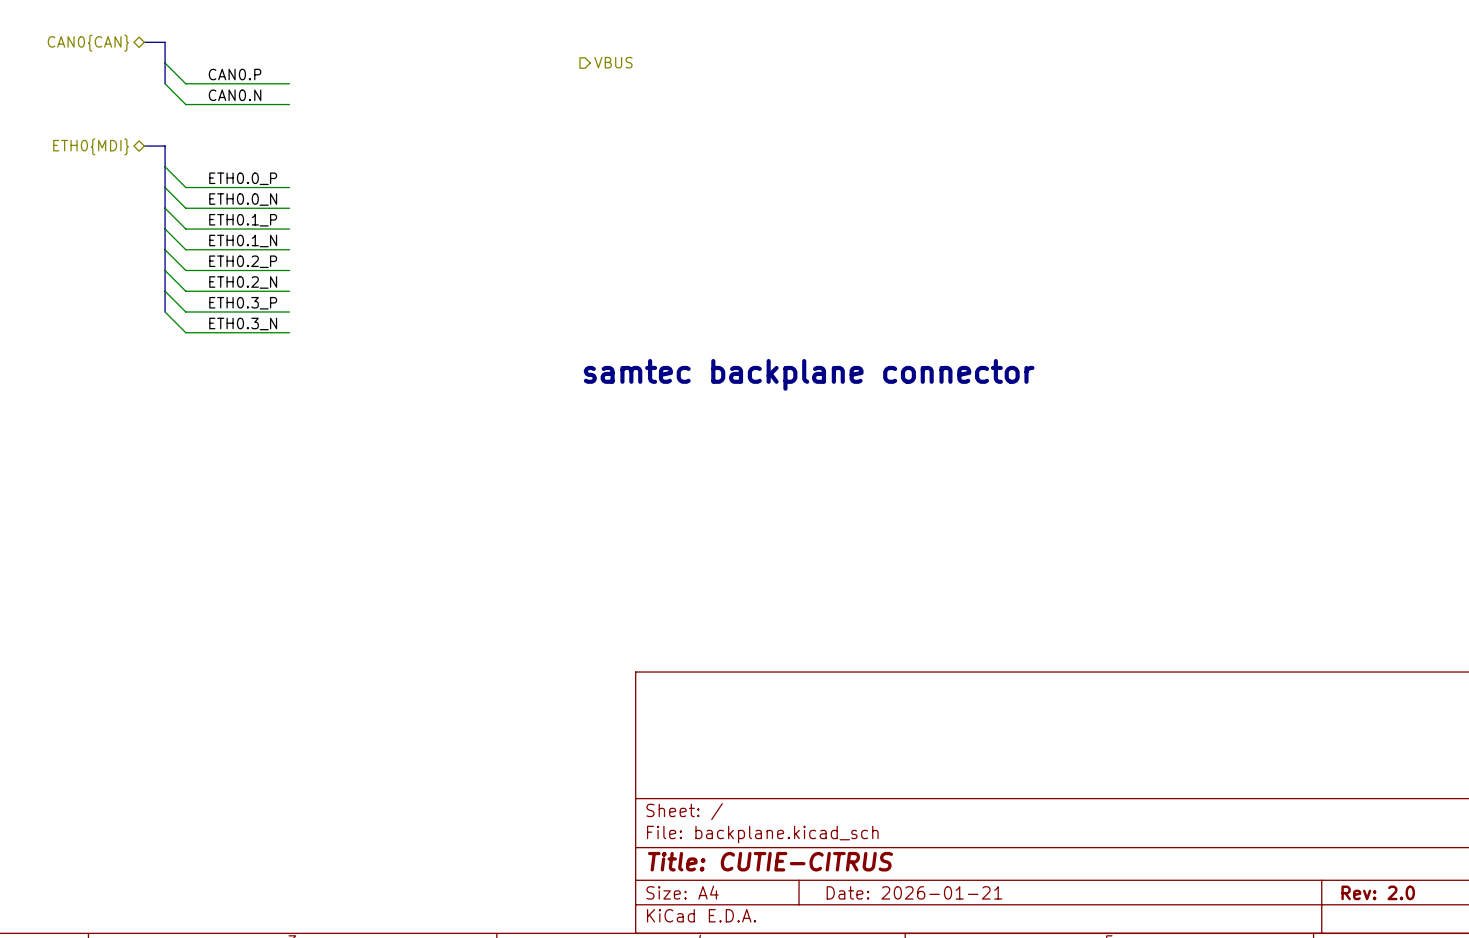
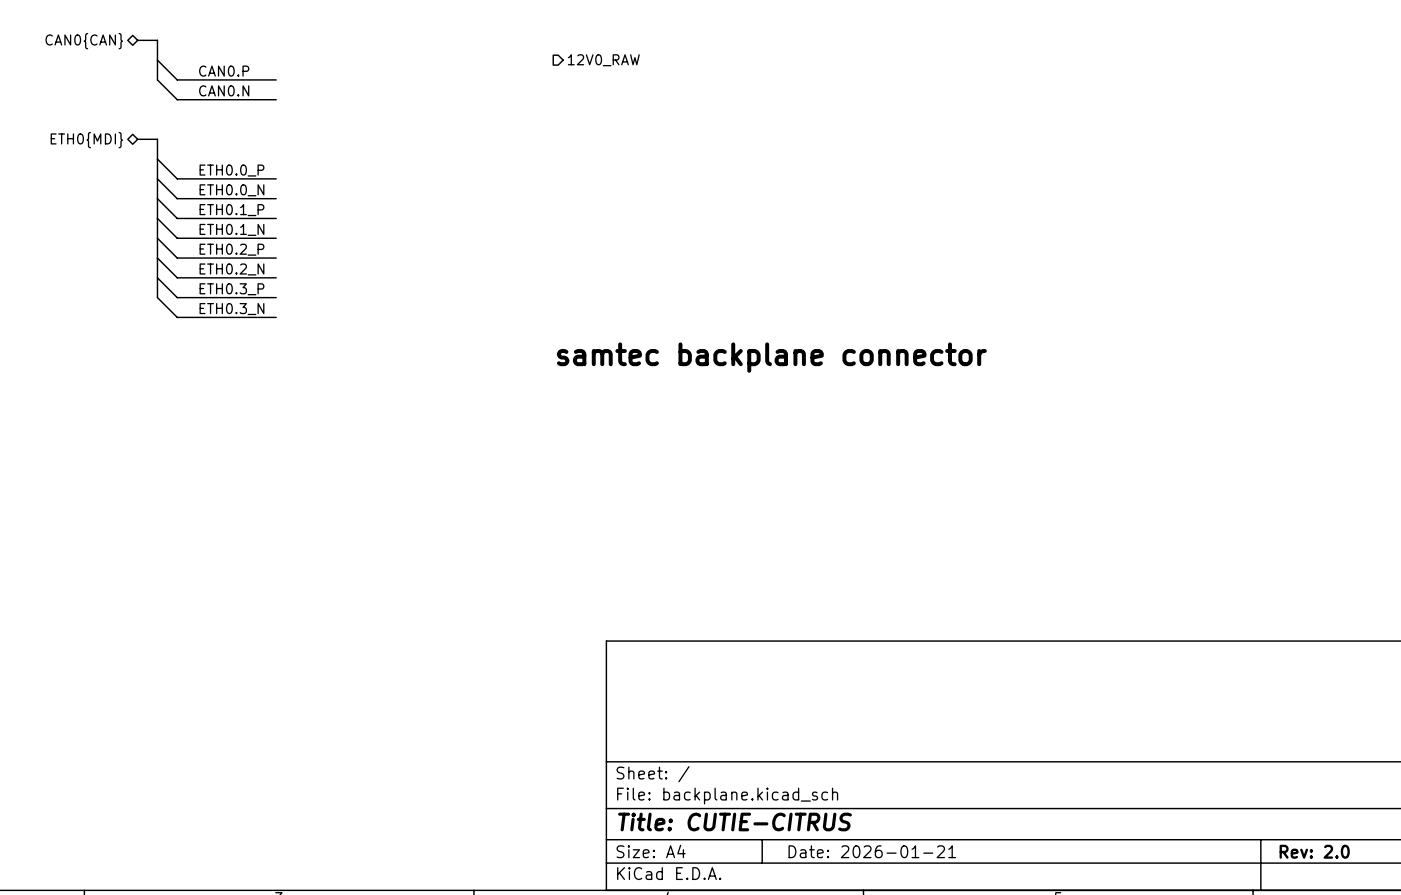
hierarchical label: VBUS (613, 62) -> 12V0_RAW (603, 60)

